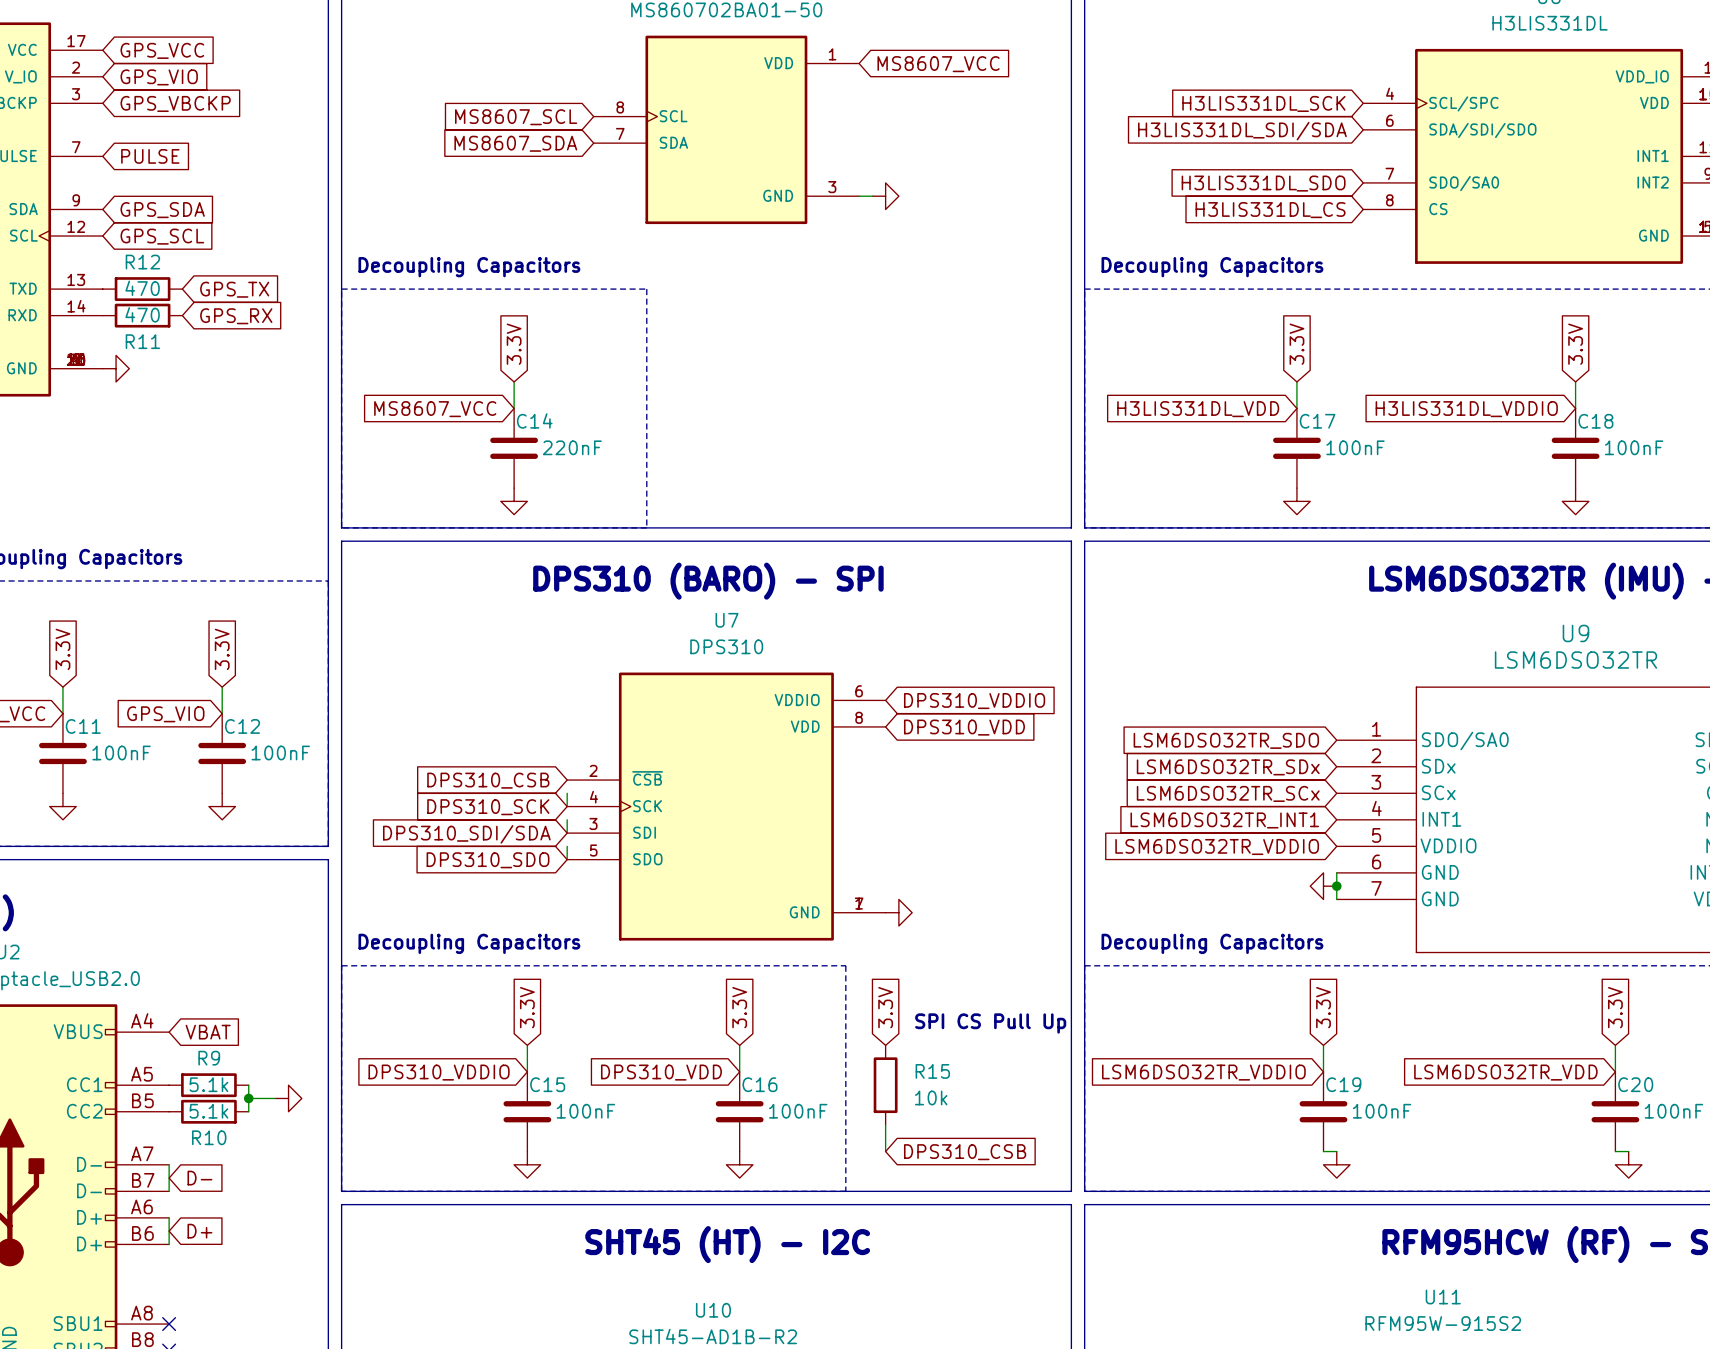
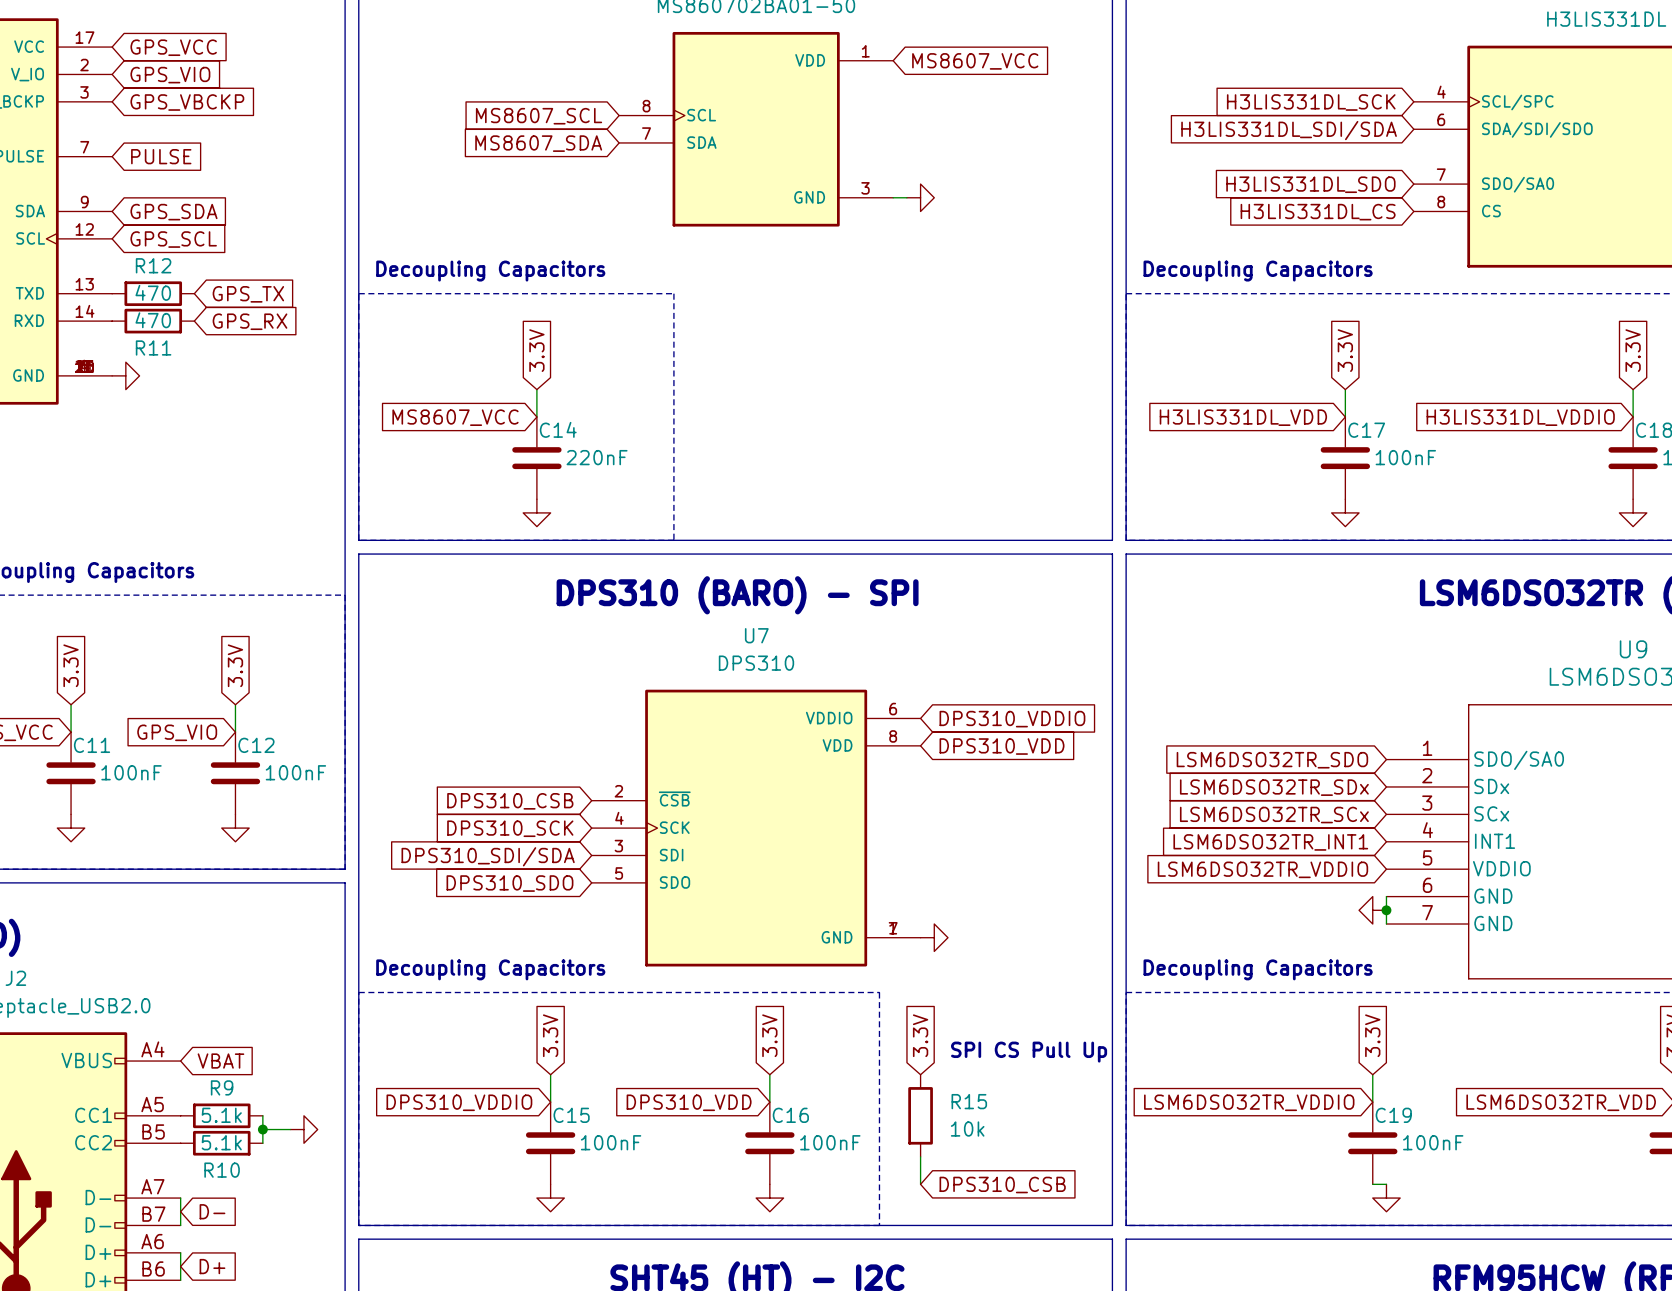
wire: (567, 793) (567, 806) -> none
wire: (567, 819) (567, 833) -> none
wire: (567, 846) (567, 859) -> none

